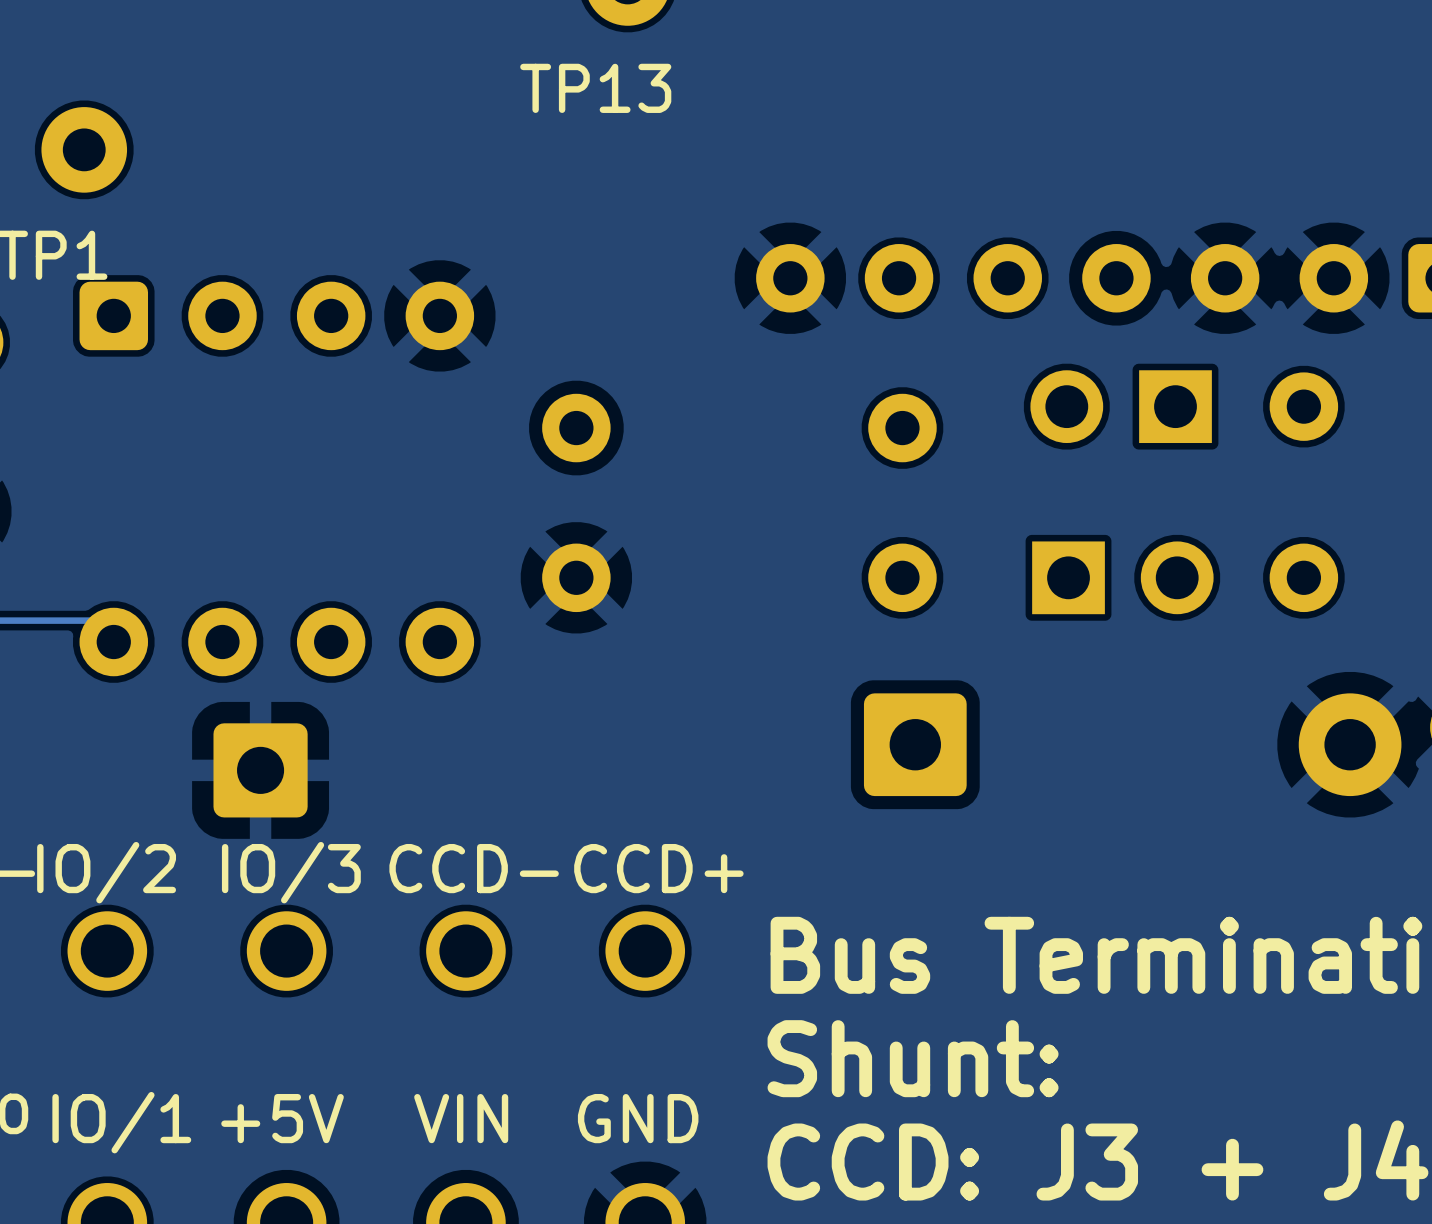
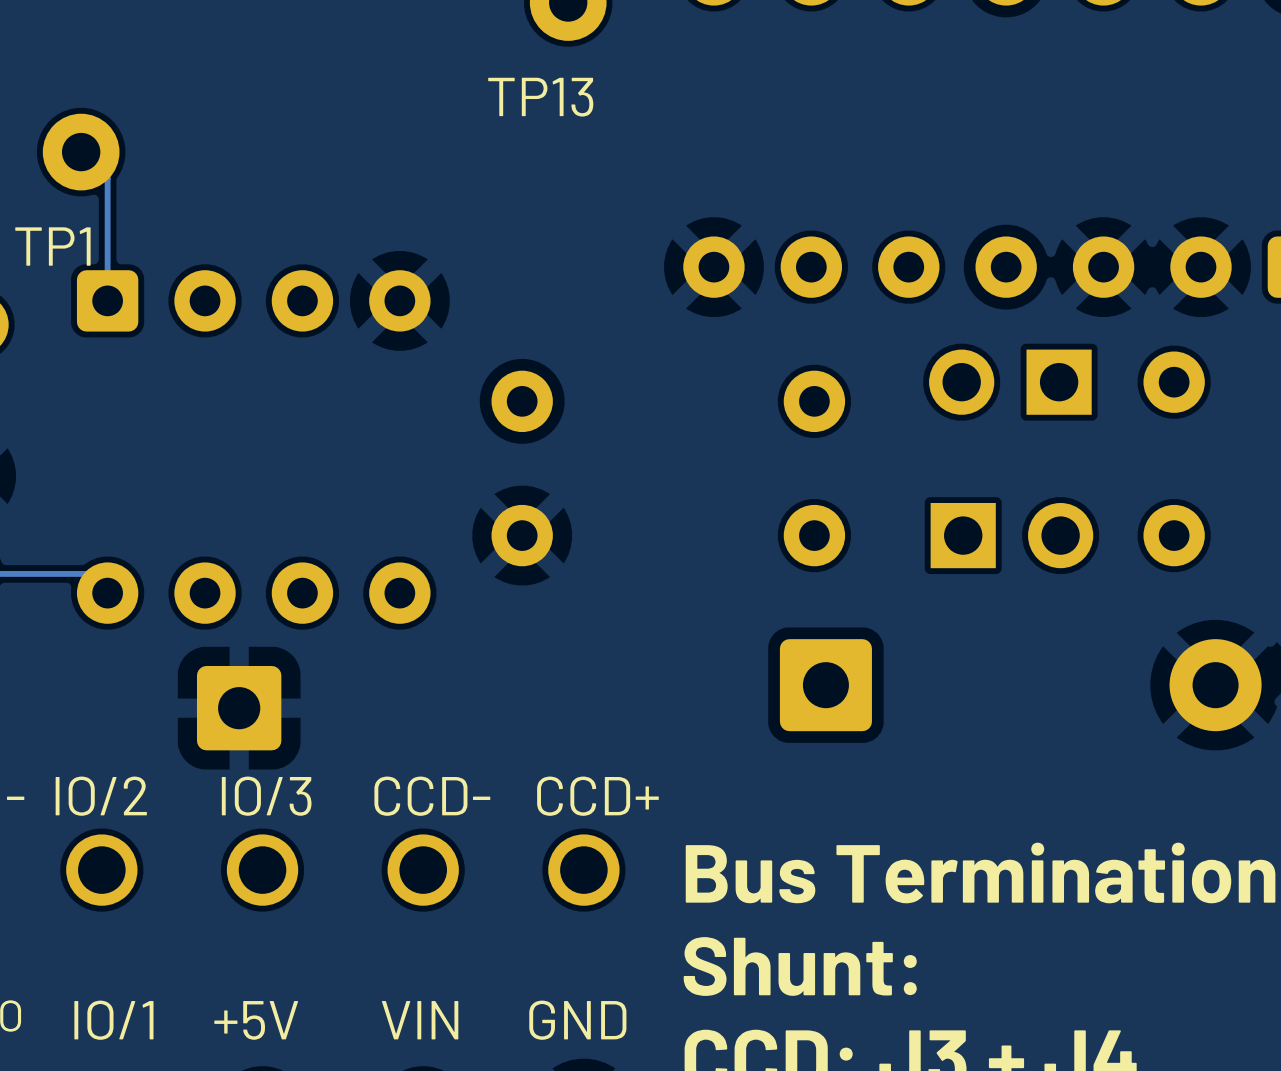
track: none -> (81, 152) (107, 178) (107, 300)

